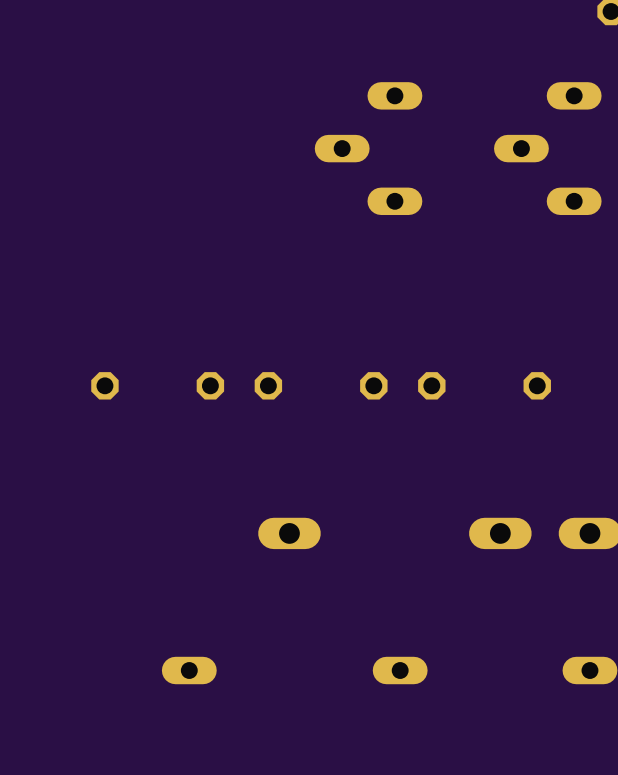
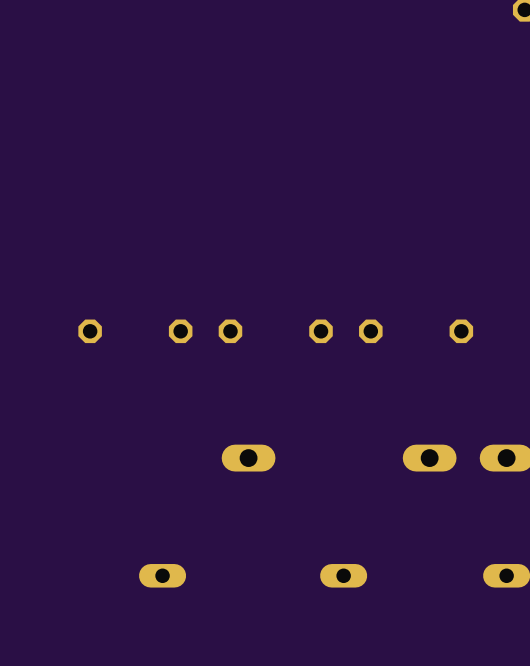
part: (368, 148) -> none
part: (547, 148) -> none

